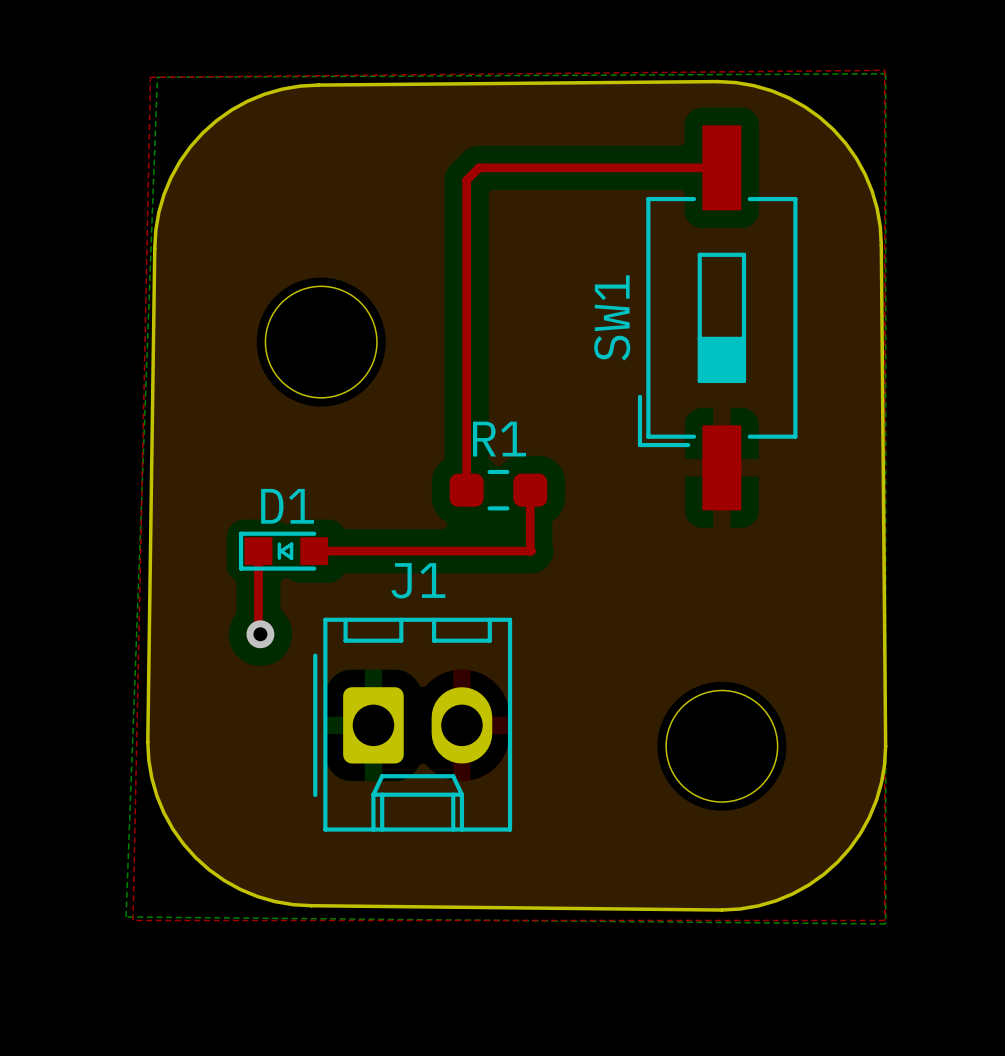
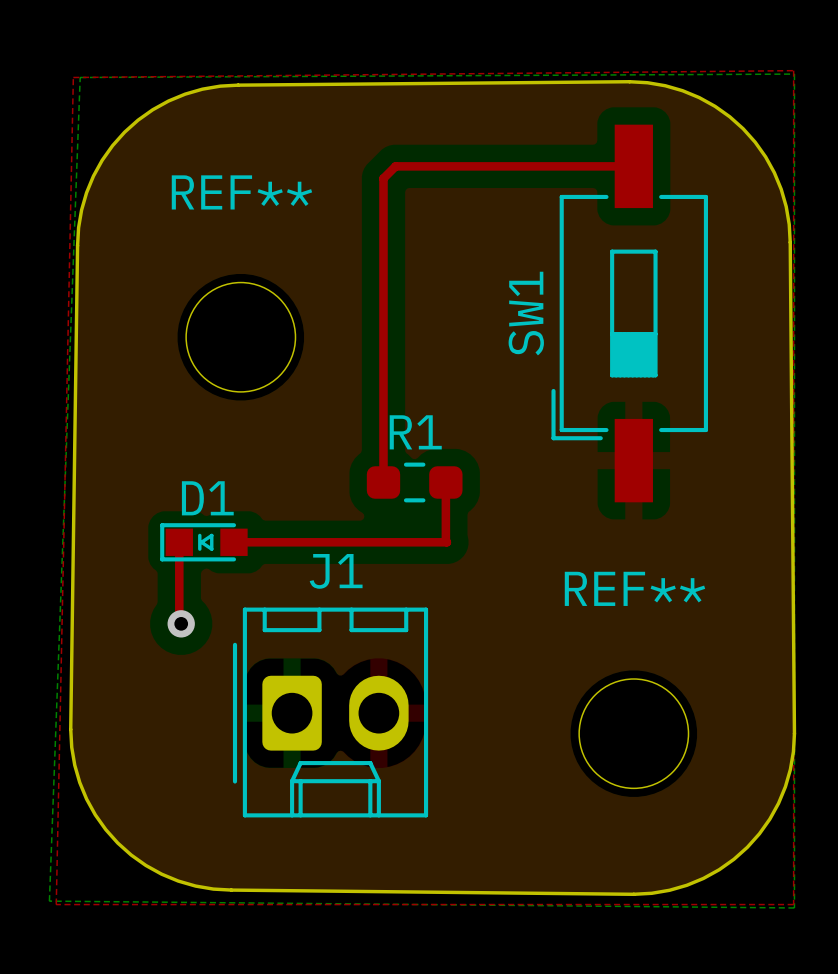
REF** name: none -> REF** (241, 192)
REF** name: none -> REF** (634, 588)

